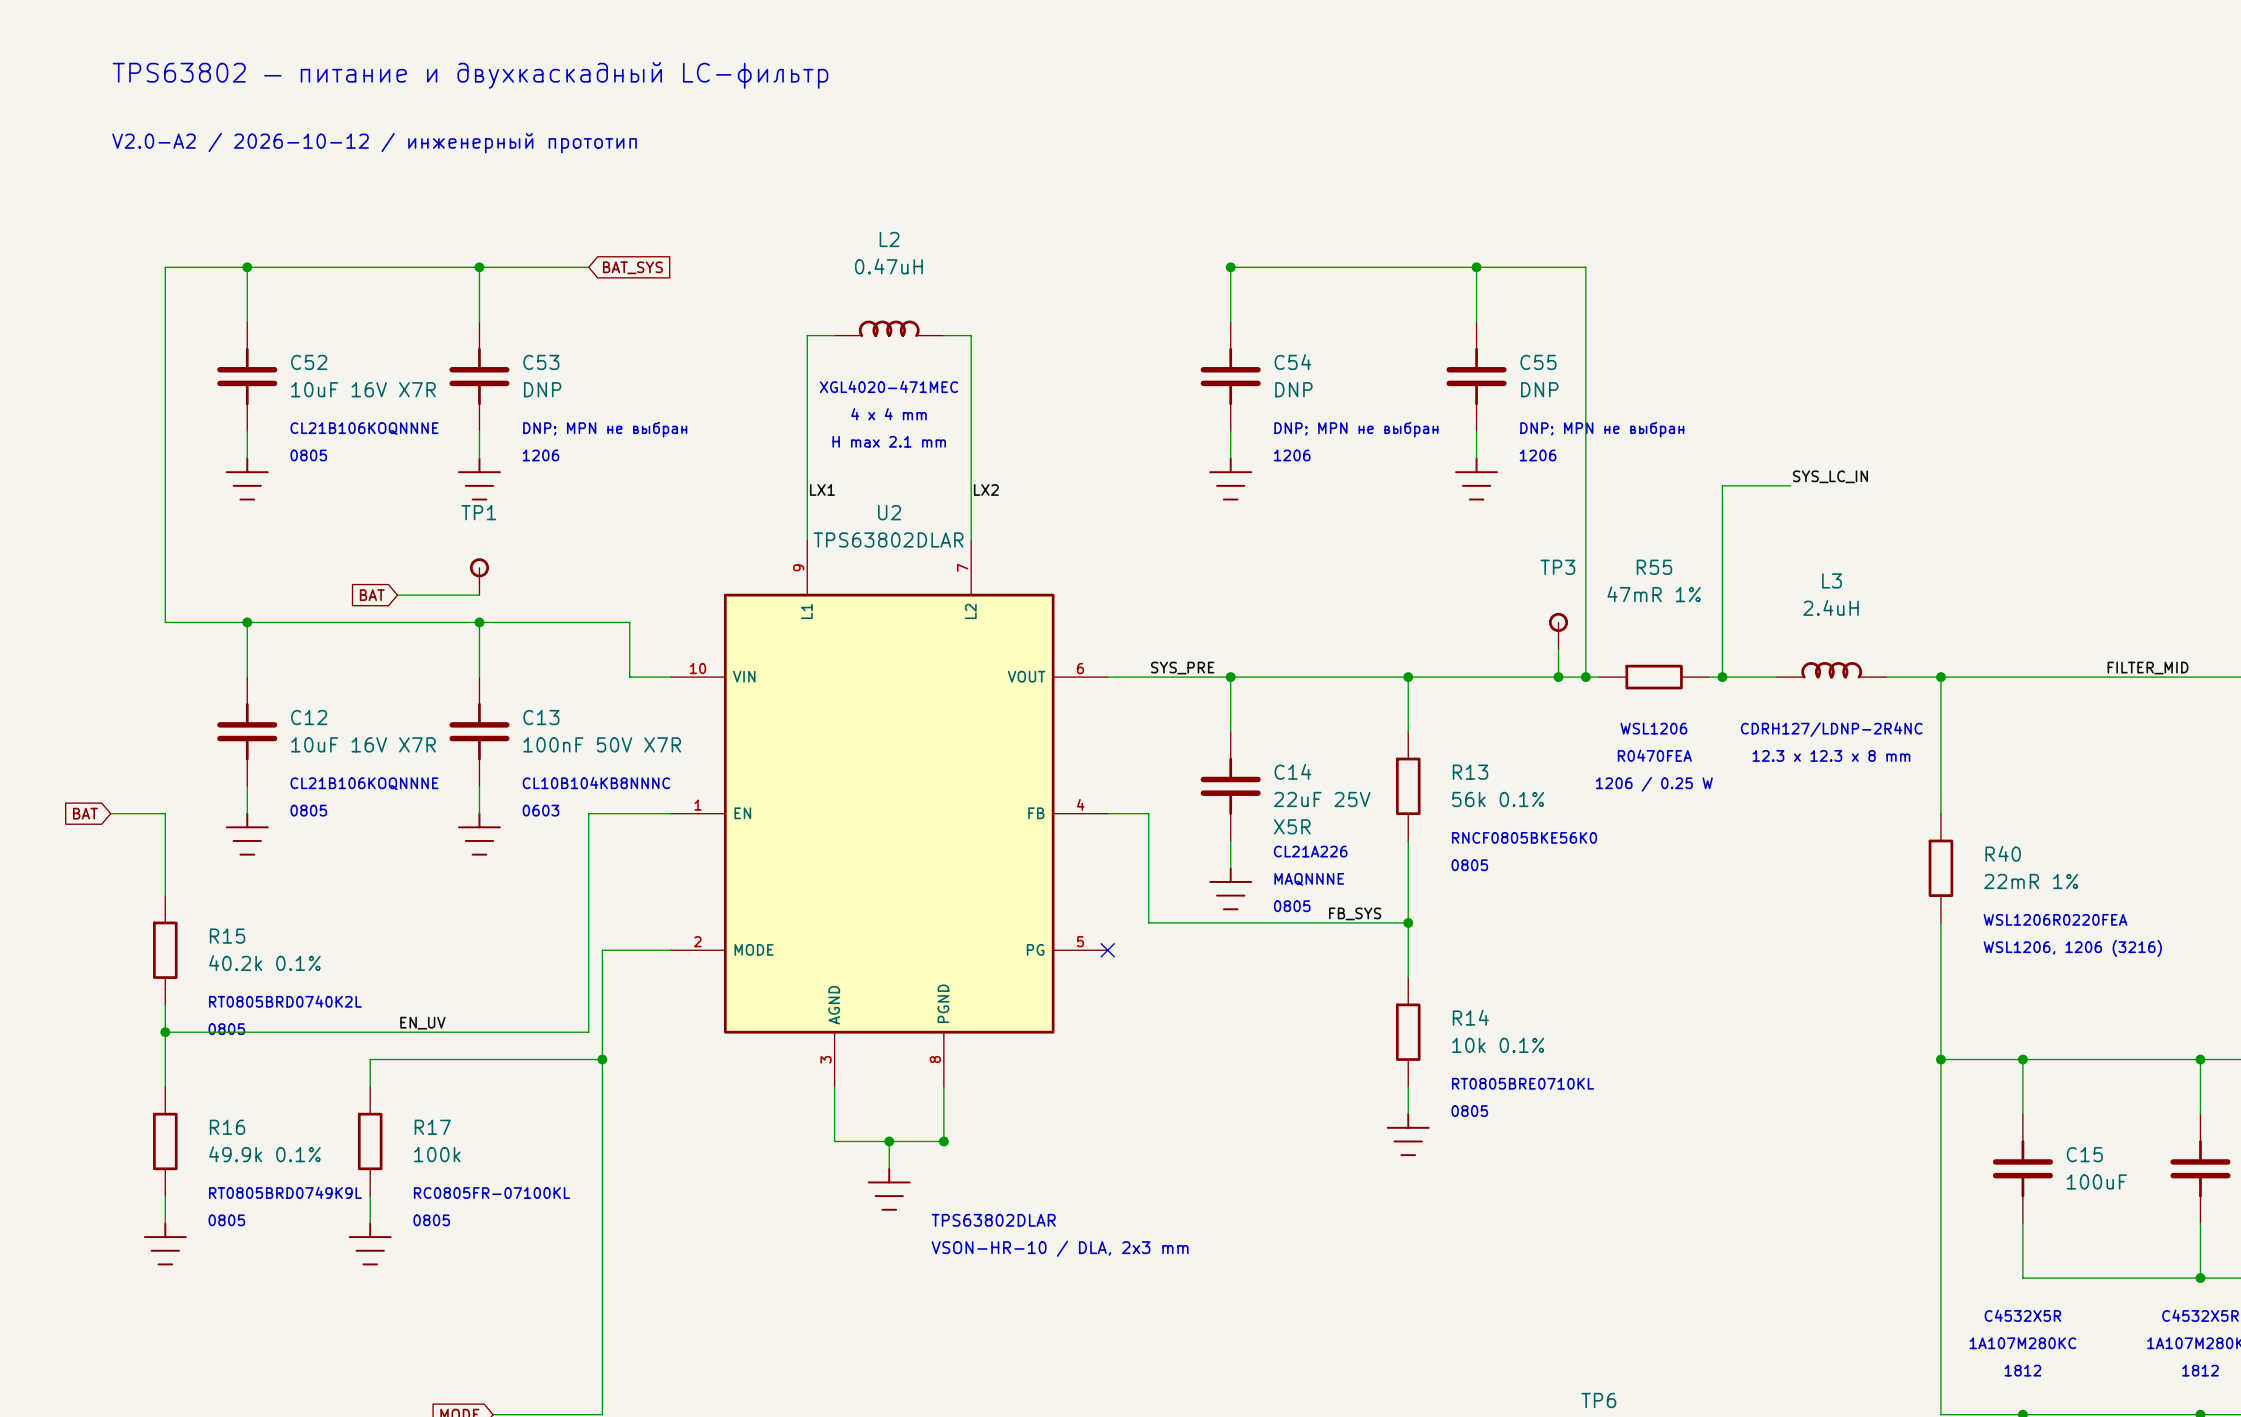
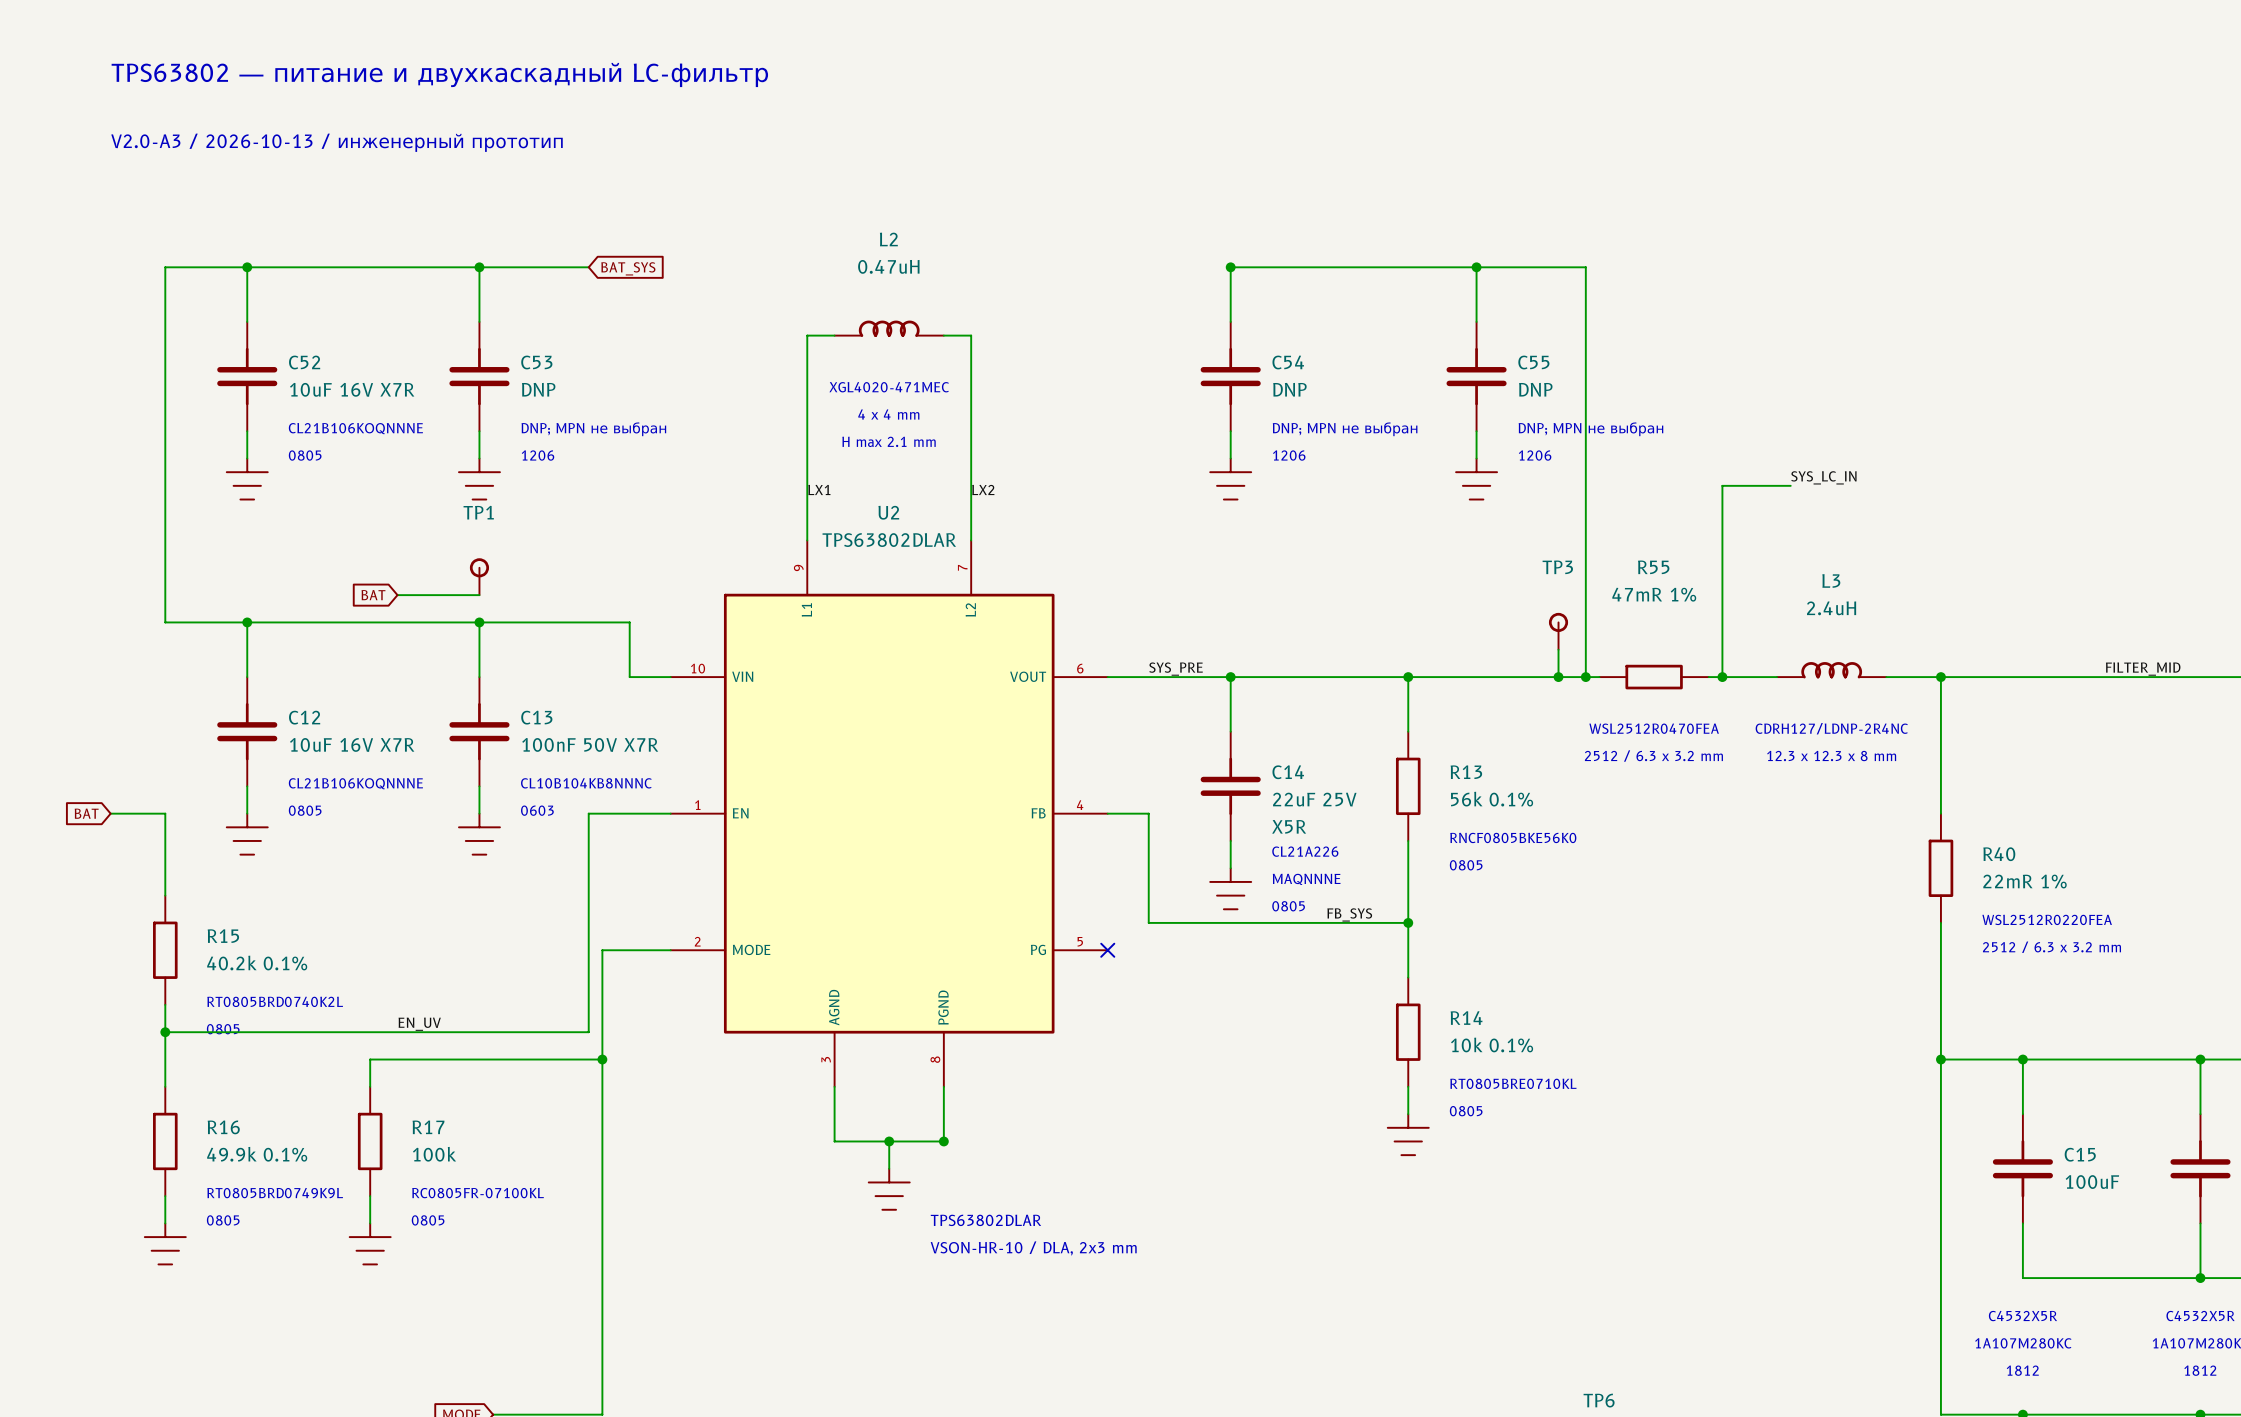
text: V2.0-A2 / 2026-10-12 / инженерный прототип (374, 143) -> V2.0-A3 / 2026-10-13 / инженерный прототип (337, 142)
text: WSL1206 (1653, 728) -> WSL2512R0470FEA (1654, 728)
text: R0470FEA (1654, 755) -> 2512 / 6.3 x 3.2 mm (1653, 756)
text: 1206 / 0.25 W (1654, 784) -> none
text: WSL1206R0220FEA (2055, 919) -> WSL2512R0220FEA (2047, 919)
text: WSL1206, 1206 (3216) (2072, 948) -> 2512 / 6.3 x 3.2 mm (2051, 947)

